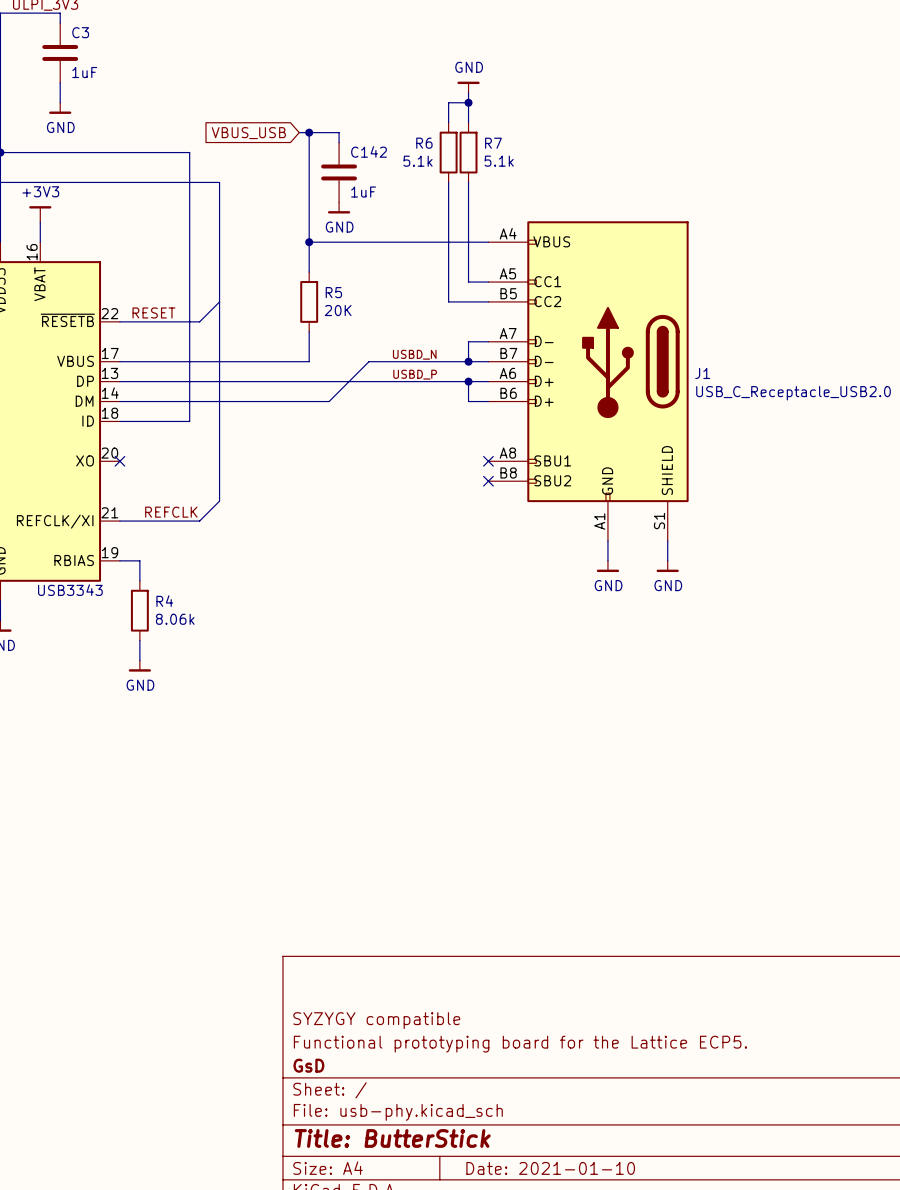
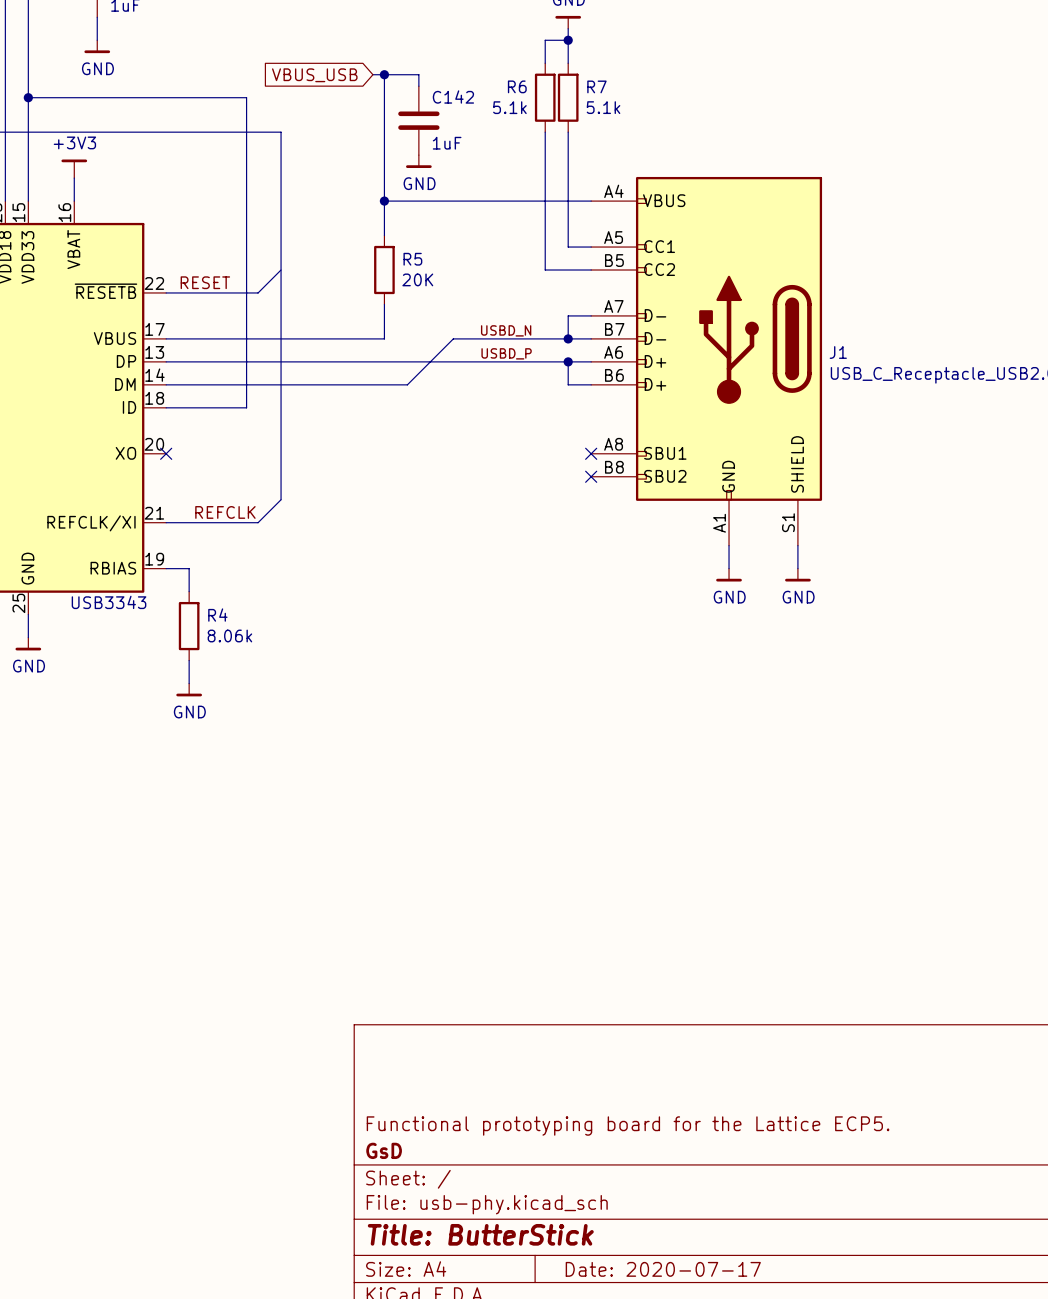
title block: SYZYGY compatible (376, 1020) -> none
title block: Date: 2021-01-10 (550, 1168) -> Date: 2020-07-17 (663, 1269)

